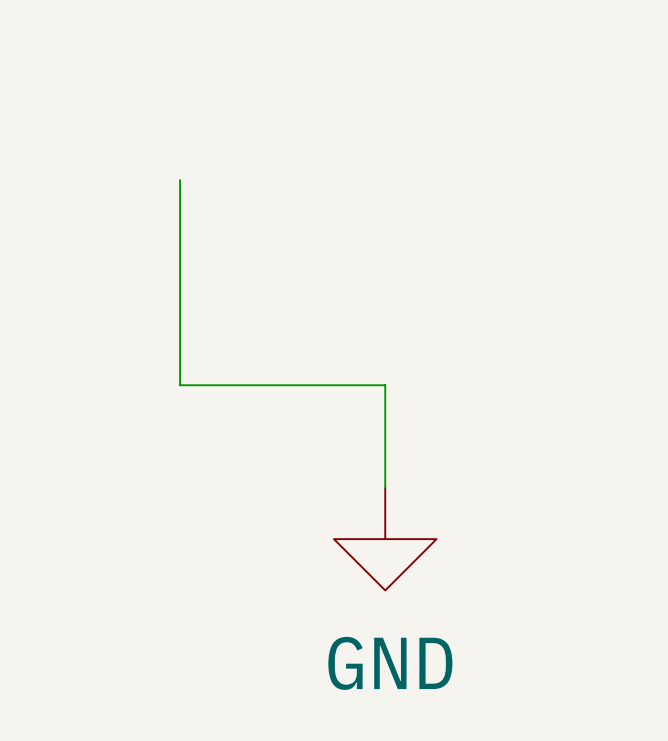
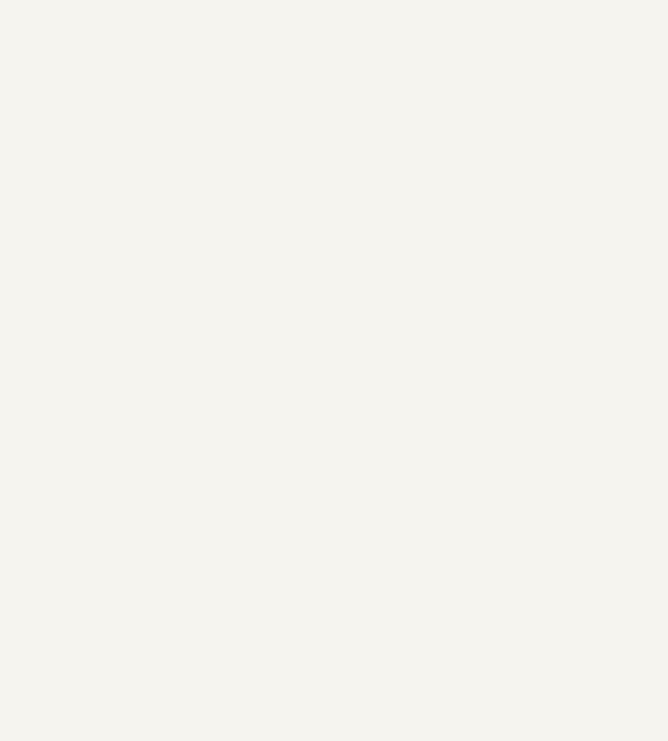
wire: (180, 180) (180, 385) (385, 385) (385, 487) -> none
power symbol: GND (385, 539) -> none

